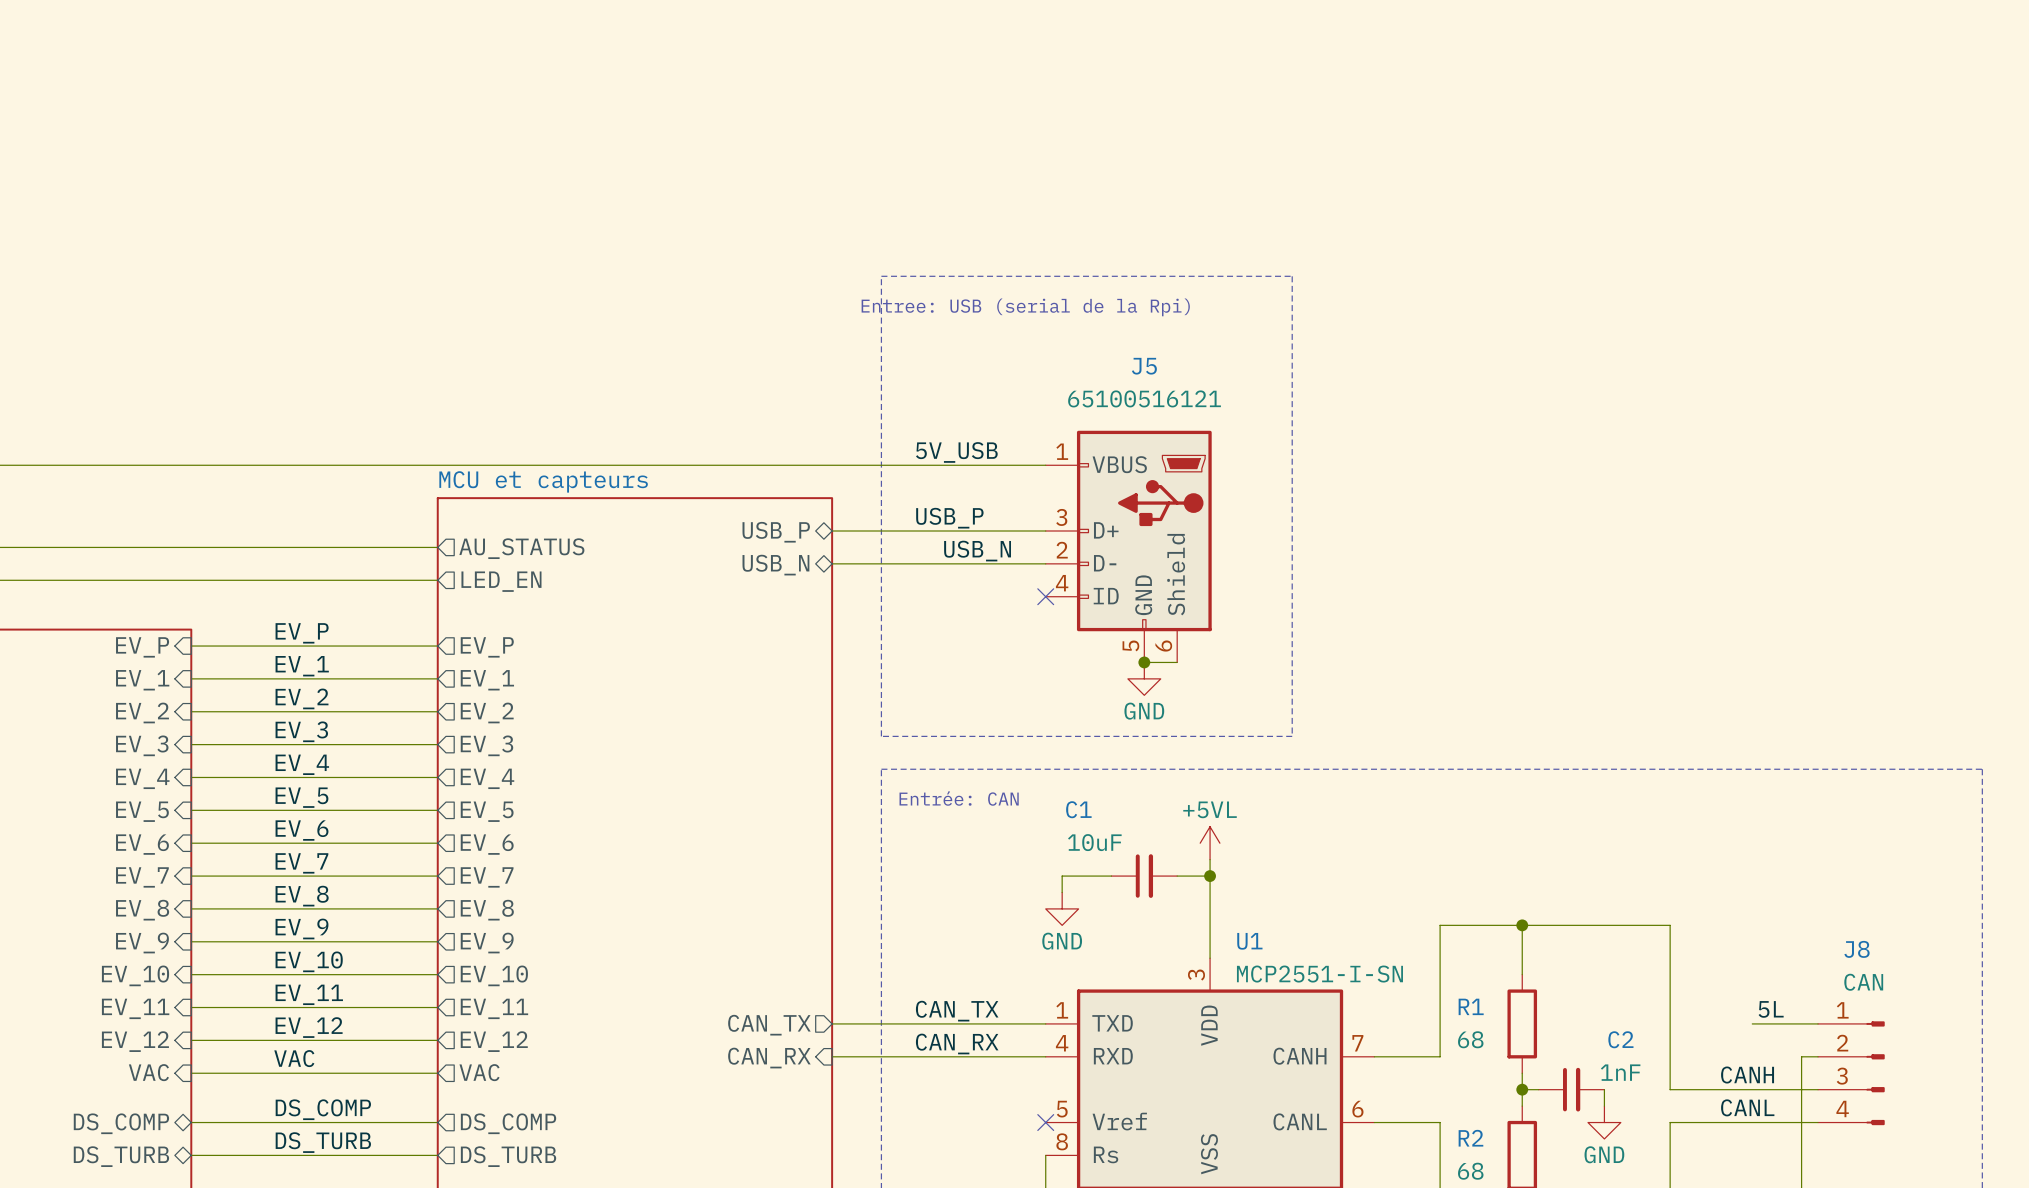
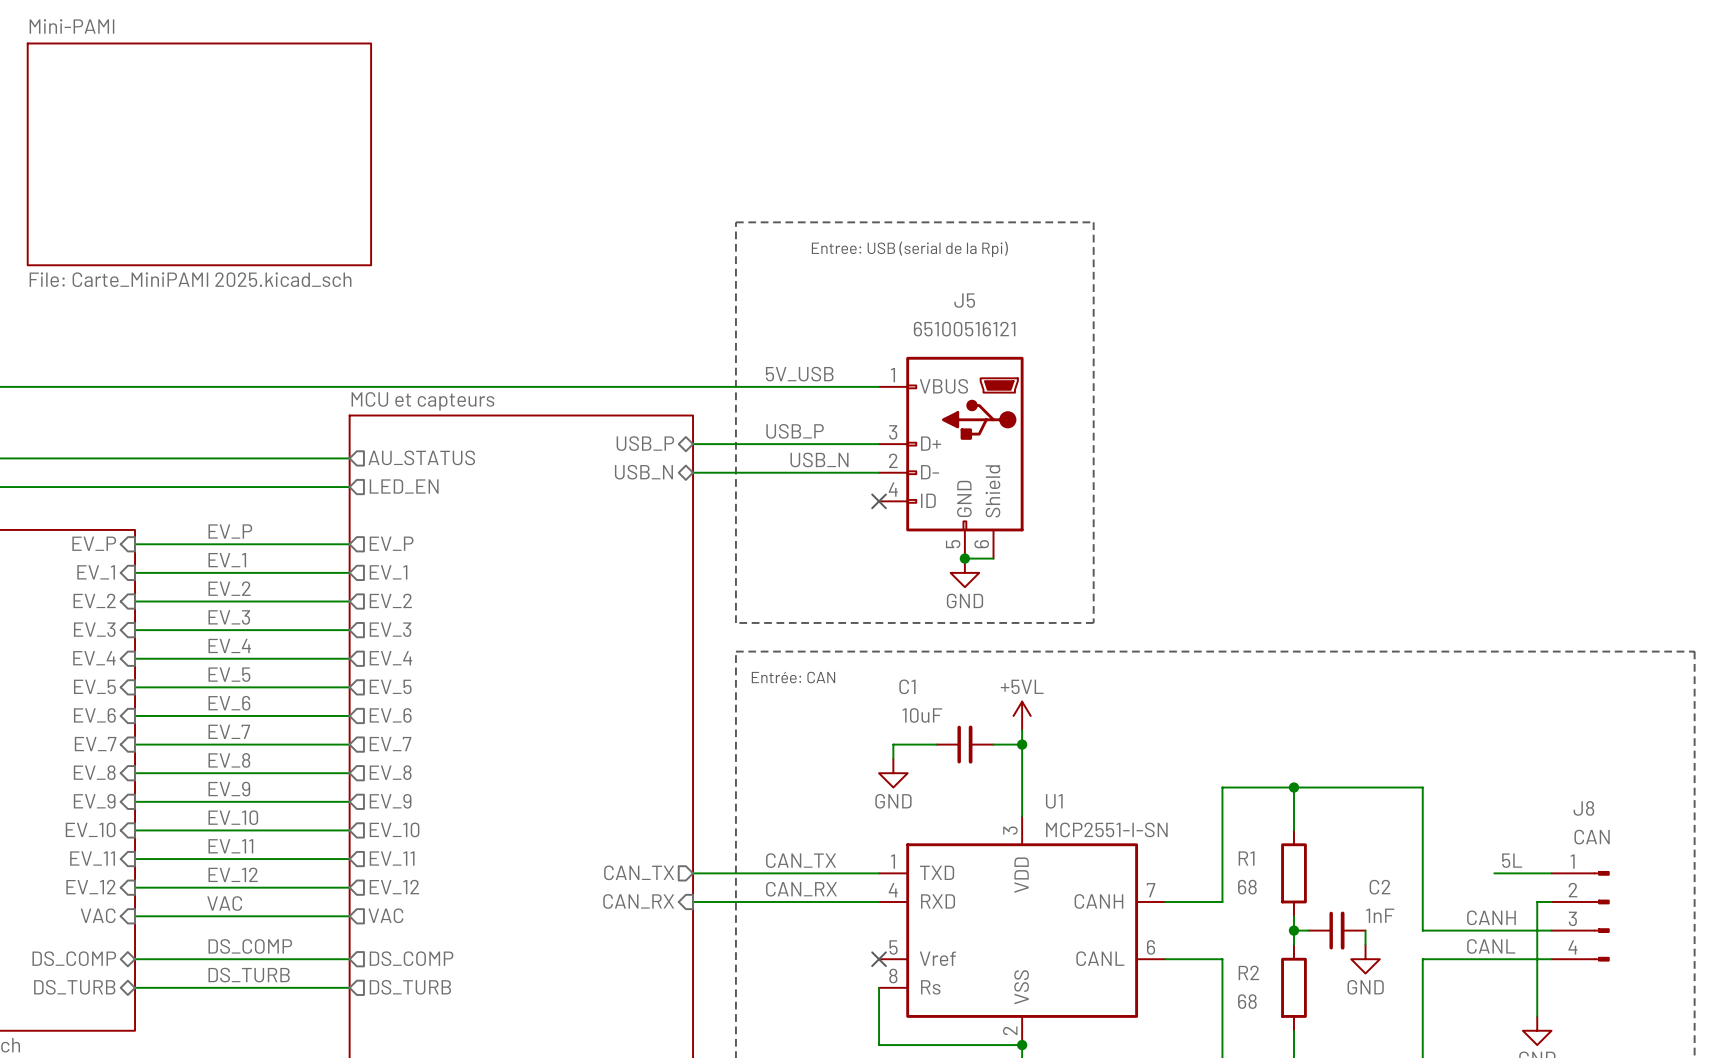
sheet Mini-PAMI: none -> File: Carte_MiniPAMI 2025.kicad_sch (199, 154)

